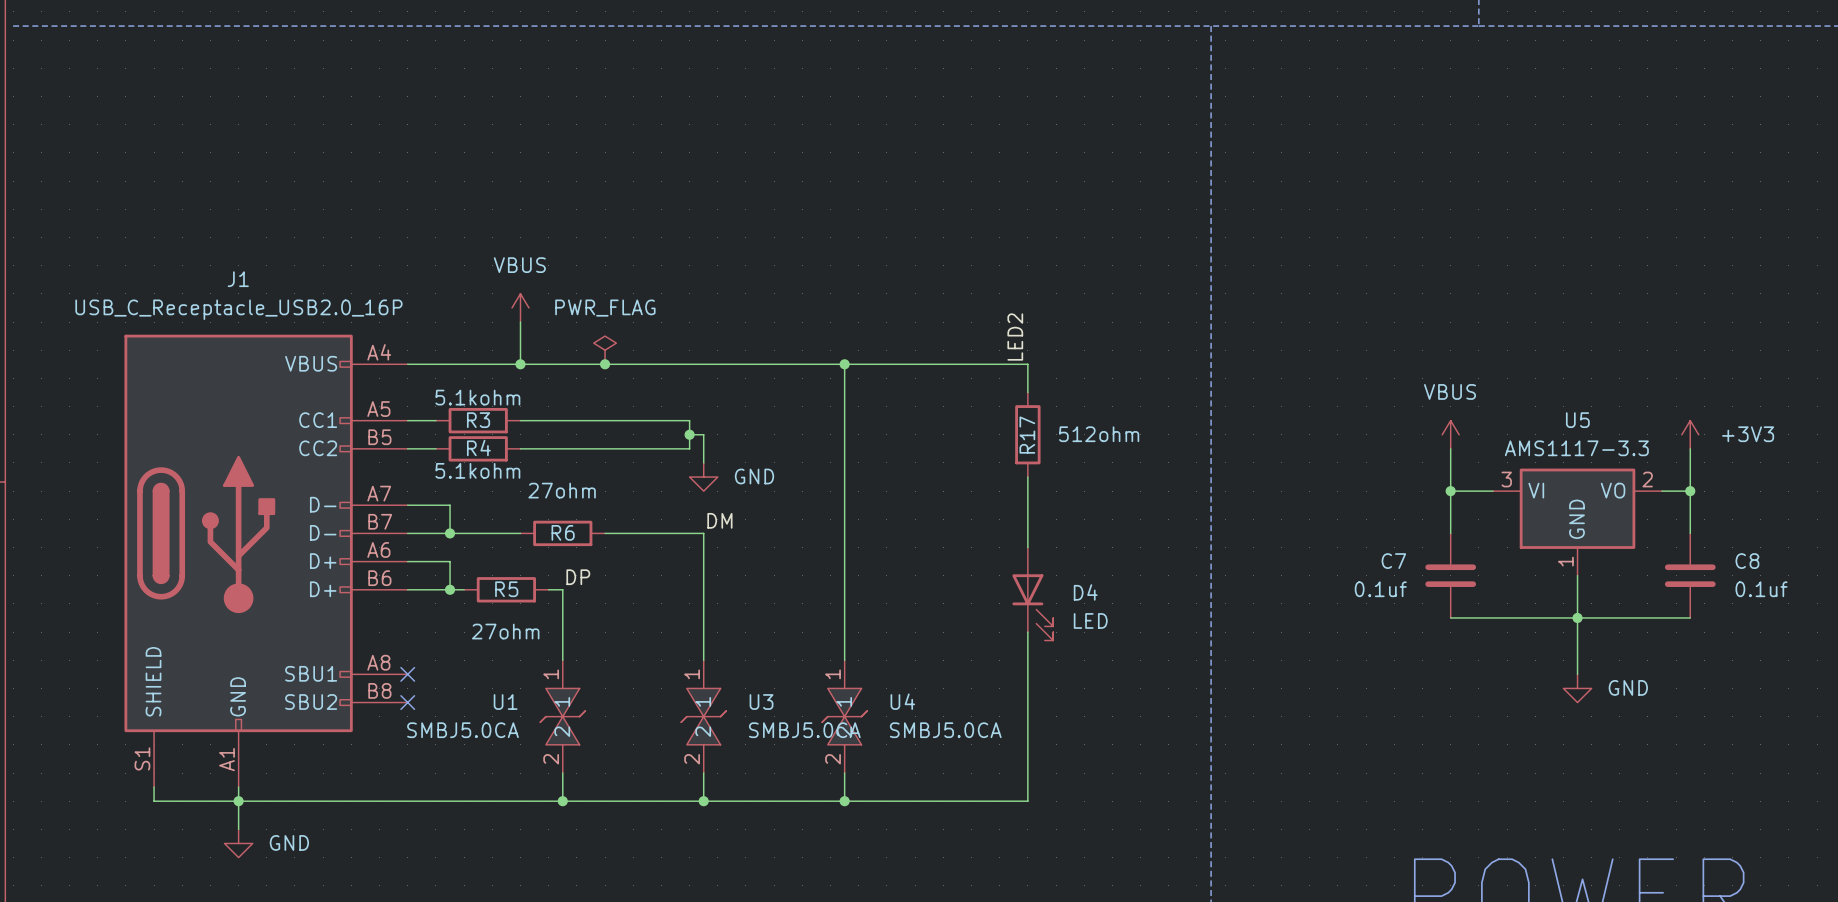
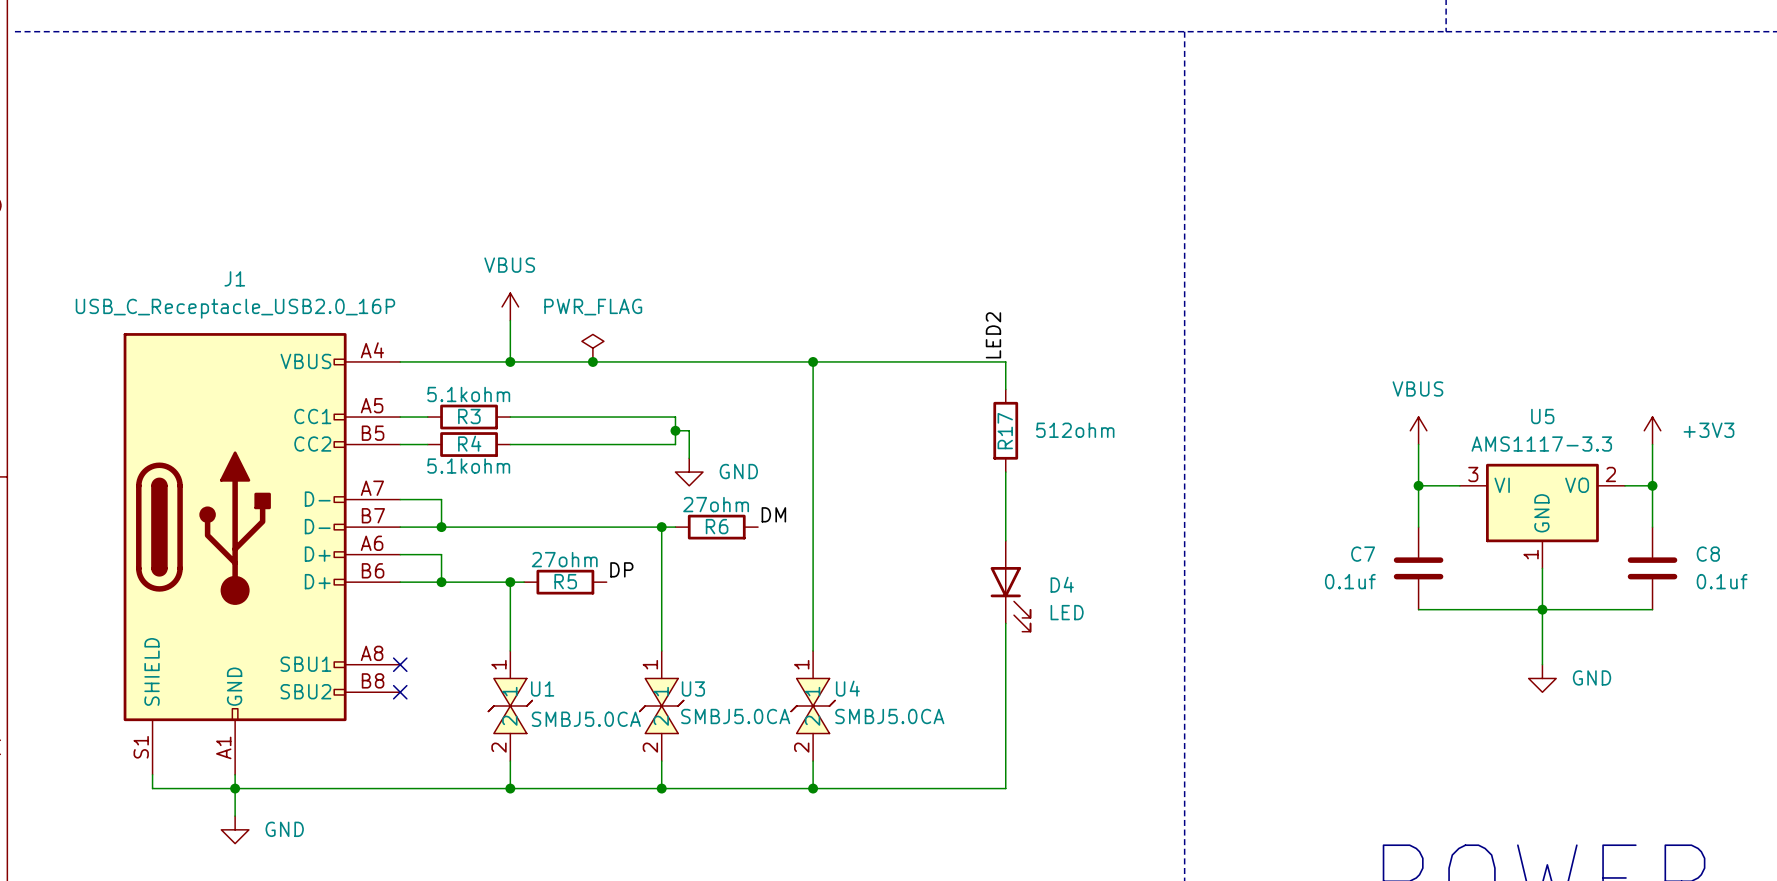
wire: (844, 364) (844, 660) -> (813, 361) (813, 650)
junction position: (844, 364) -> (813, 361)
R6 value position: 27ohm (562, 490) -> 27ohm (716, 504)
label position: DM (719, 520) -> DM (773, 514)
wire: none -> (510, 527) (592, 527)
R6 position: (562, 533) -> (716, 527)
wire: none -> (661, 527) (661, 650)
junction: none -> (661, 527)
wire: (689, 533) (703, 533) (703, 660) -> none
label position: DP (578, 577) -> DP (621, 569)
wire: none -> (455, 582) (524, 582)
R5 position: (506, 589) -> (565, 582)
wire: none -> (510, 582) (510, 650)
junction: none -> (510, 582)
wire: (548, 589) (562, 589) (562, 660) -> none
R5 value position: 27ohm (505, 631) -> 27ohm (564, 559)
U4 name position: U4 (902, 701) -> U4 (847, 688)
U1 name position: U1 (505, 702) -> U1 (542, 688)
U3 name position: U3 (761, 702) -> U3 (693, 688)
U1 position: (562, 716) -> (510, 706)
U3 position: (703, 716) -> (661, 706)
U4 position: (844, 716) -> (813, 706)
U1 value position: SMBJ5.0CA (463, 730) -> SMBJ5.0CA (586, 719)
U3 value position: SMBJ5.0CA (804, 730) -> SMBJ5.0CA (735, 716)
U4 value position: SMBJ5.0CA (945, 730) -> SMBJ5.0CA (889, 716)
wire: (562, 773) (562, 801) -> (510, 761) (510, 788)
wire: (703, 773) (703, 801) -> (661, 761) (661, 788)
wire: (844, 773) (844, 801) -> (813, 761) (813, 788)
junction position: (562, 801) -> (510, 788)
junction position: (703, 801) -> (661, 788)
junction position: (844, 801) -> (813, 788)

